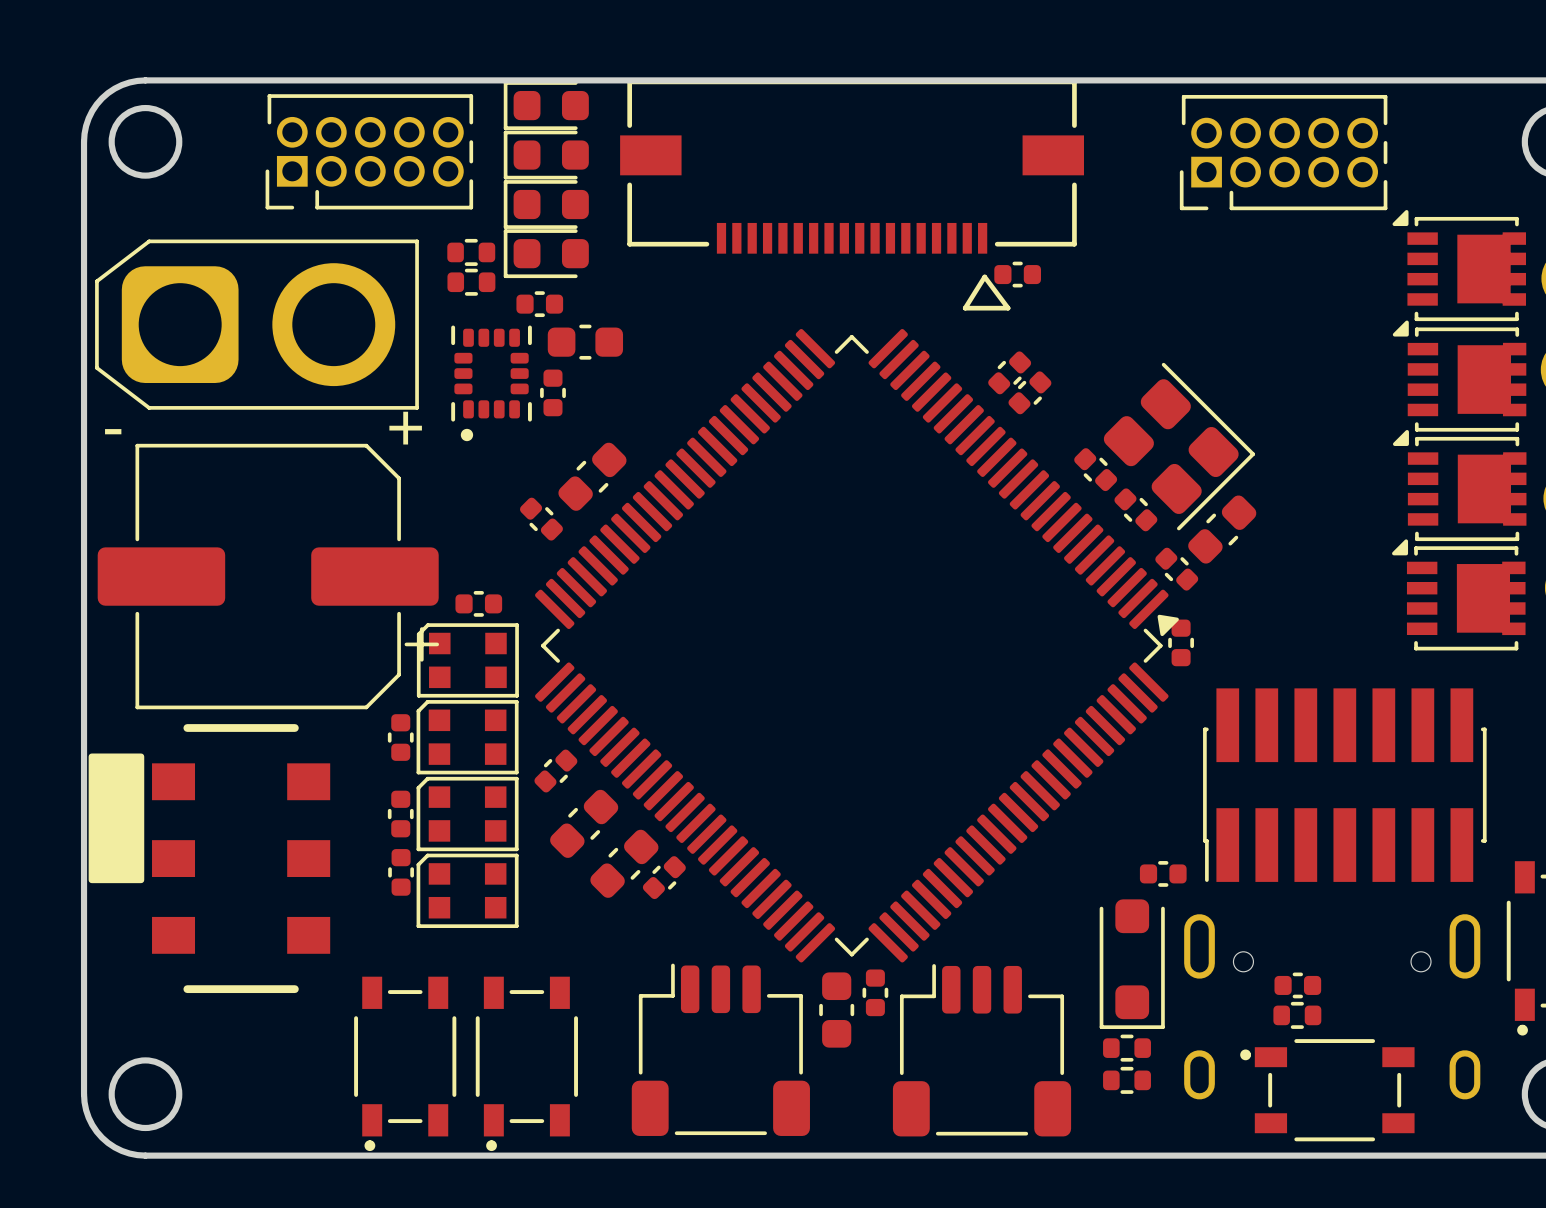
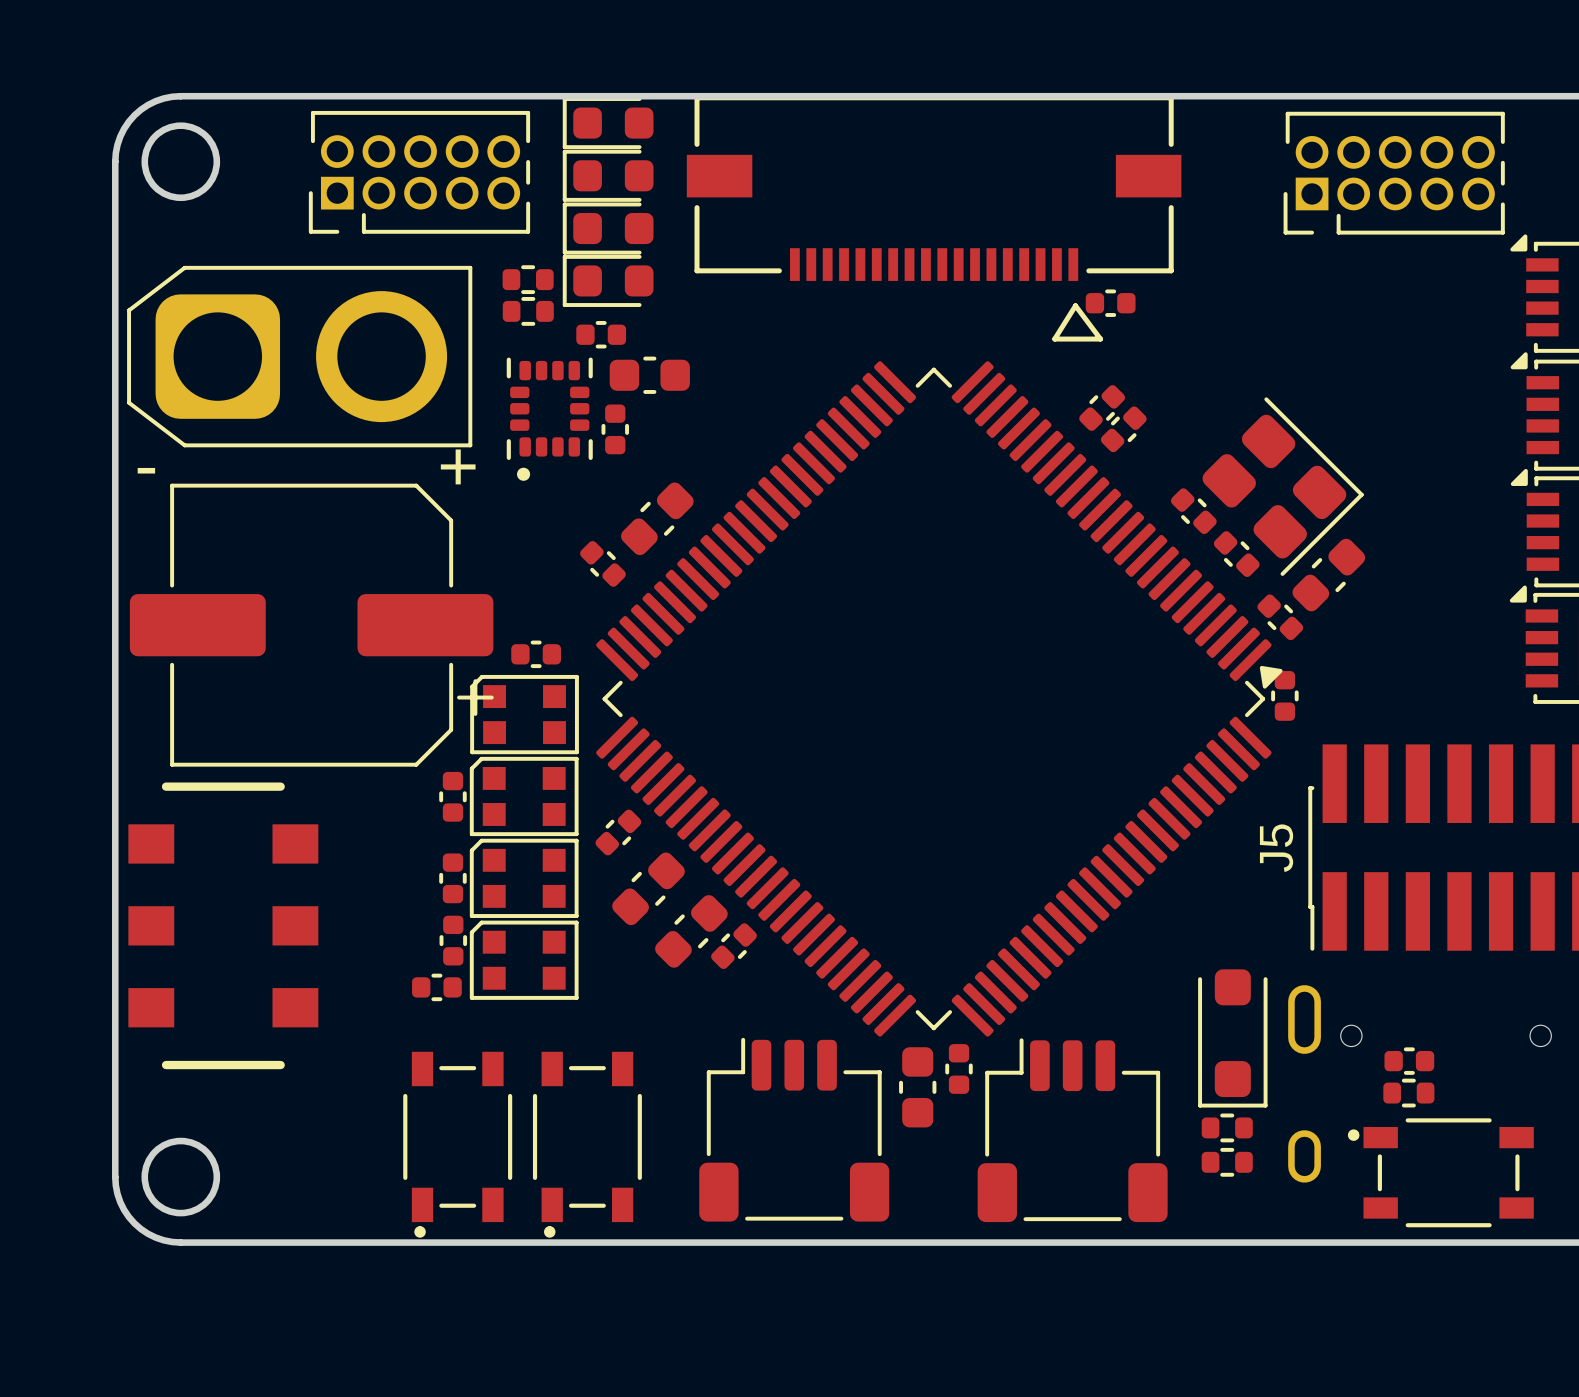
drawing: [88, 753, 145, 884] -> none
J5 name: none -> J5 (1276, 848)
part position: (241, 858) -> (223, 925)
part: (1163, 873) -> none
part: none -> (436, 987)

